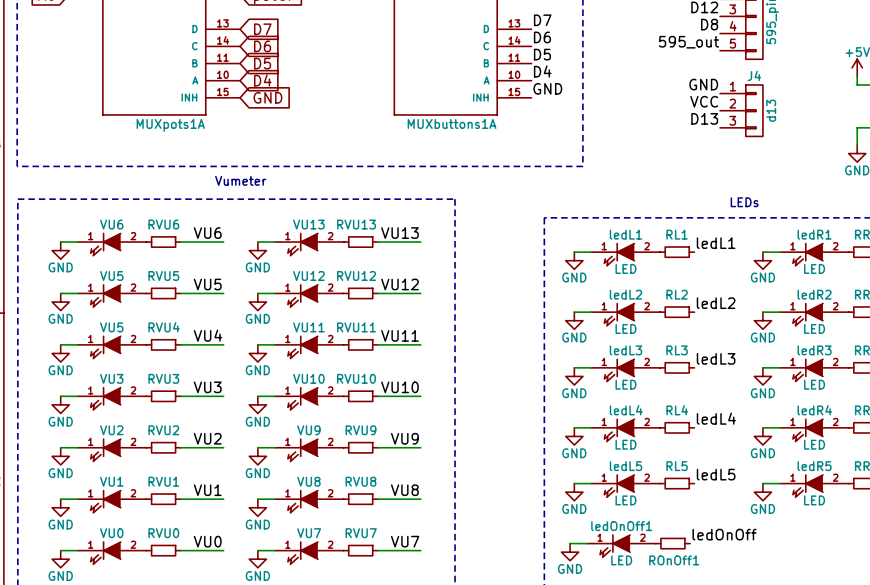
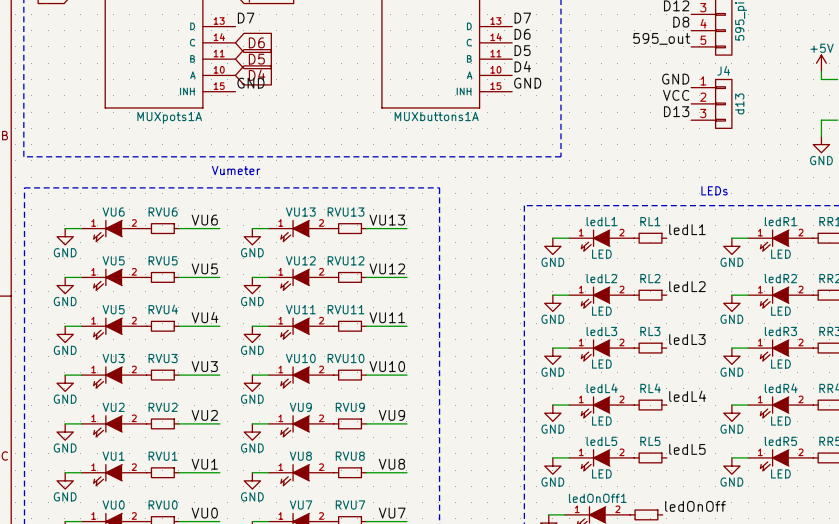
label: none -> D7 (246, 18)
global label: D7 (262, 29) -> none
label: none -> GND (250, 83)
global label: GND (267, 97) -> none

